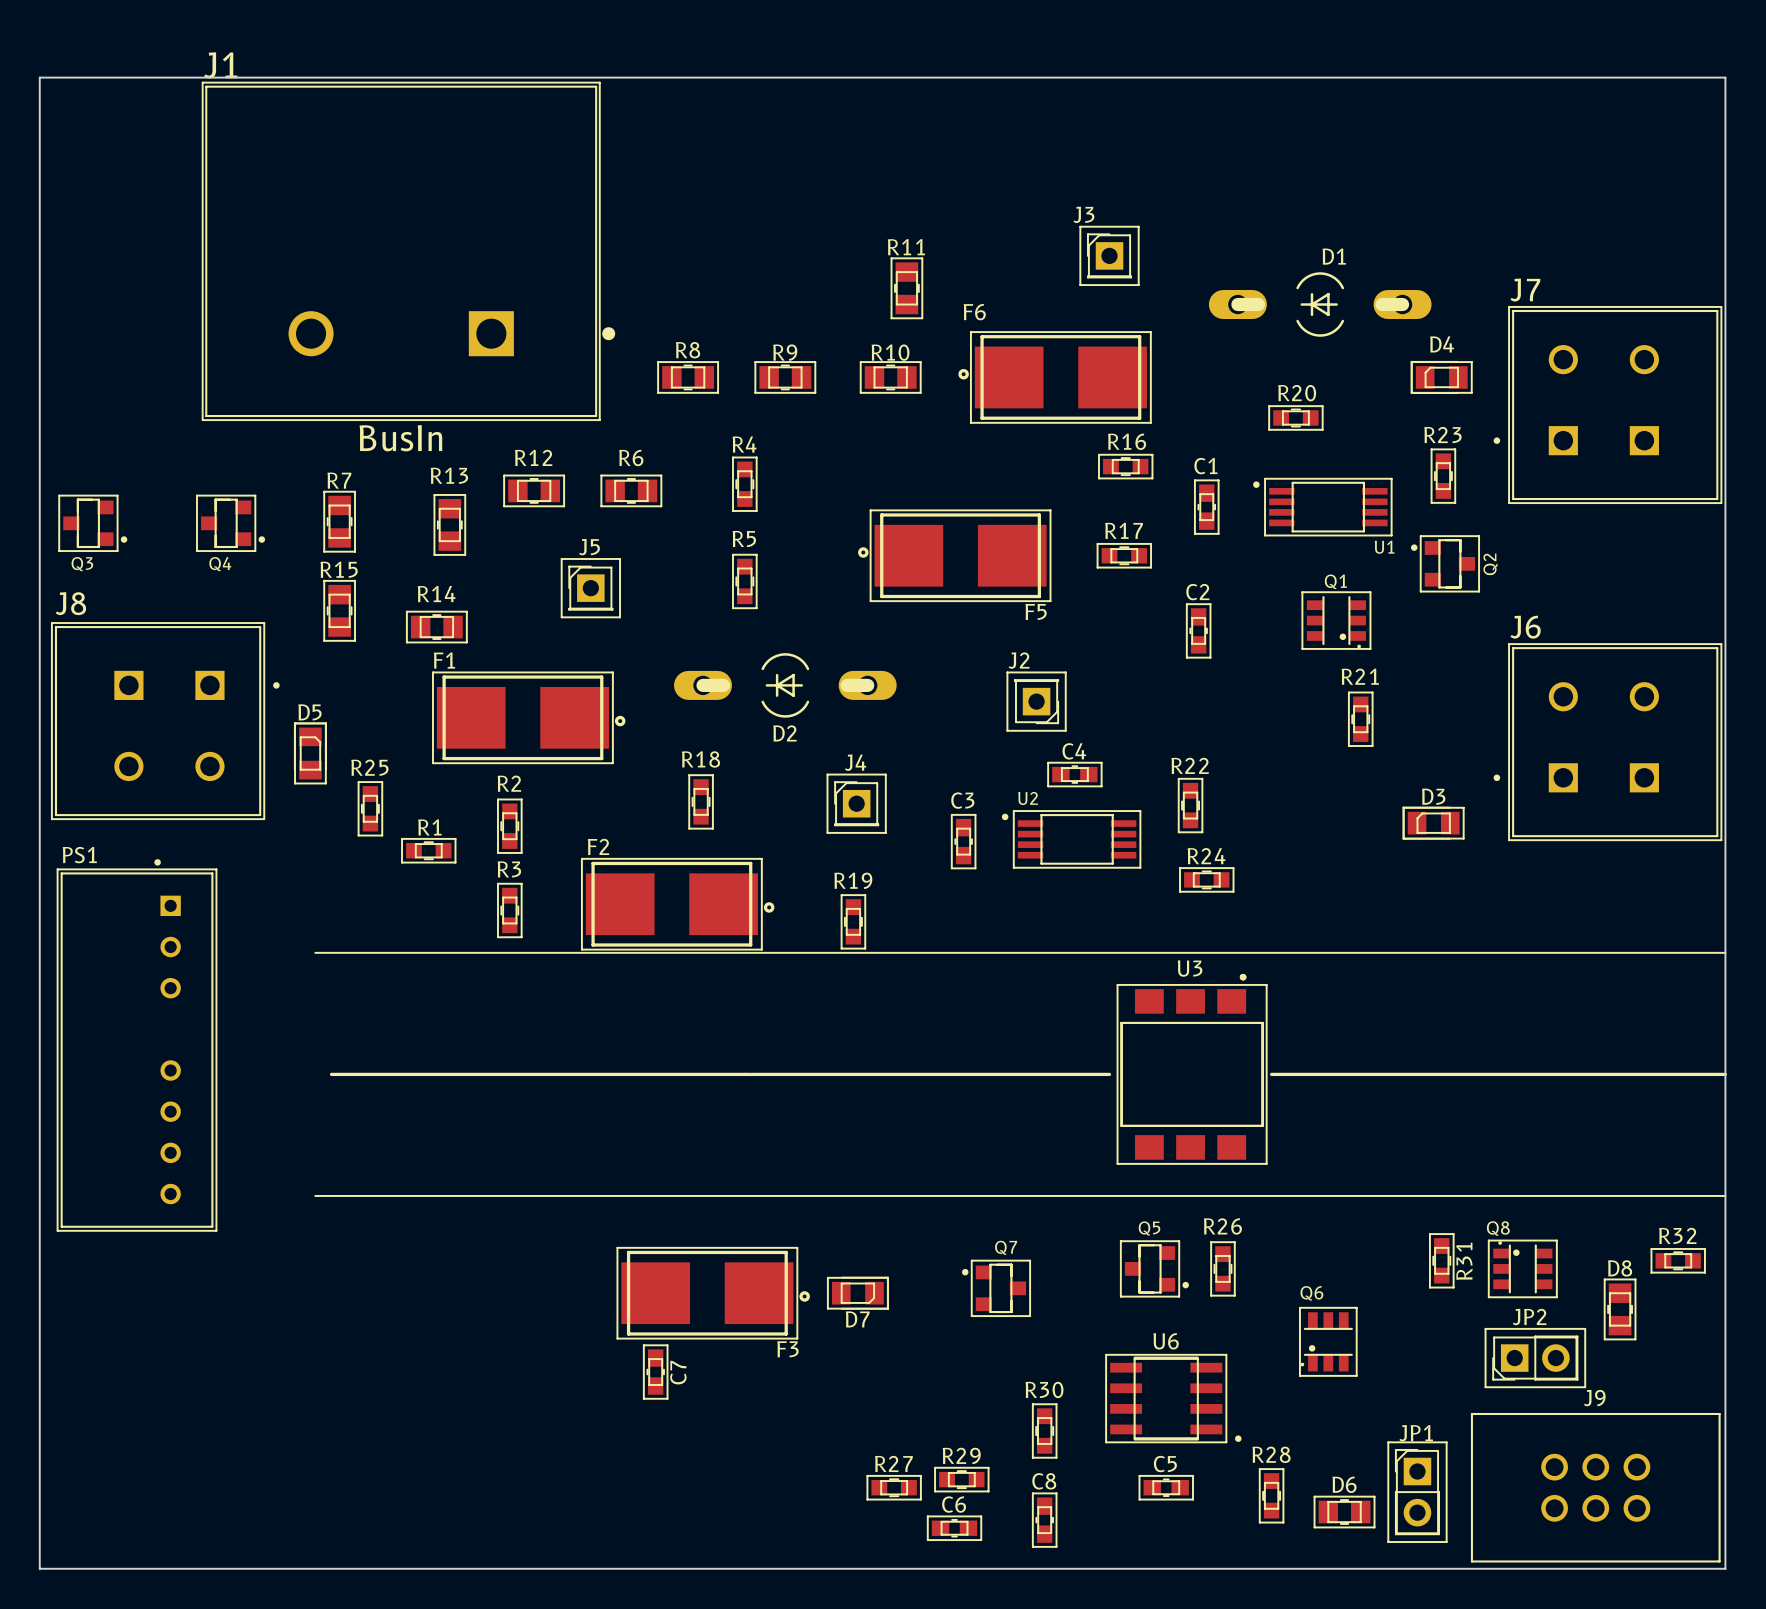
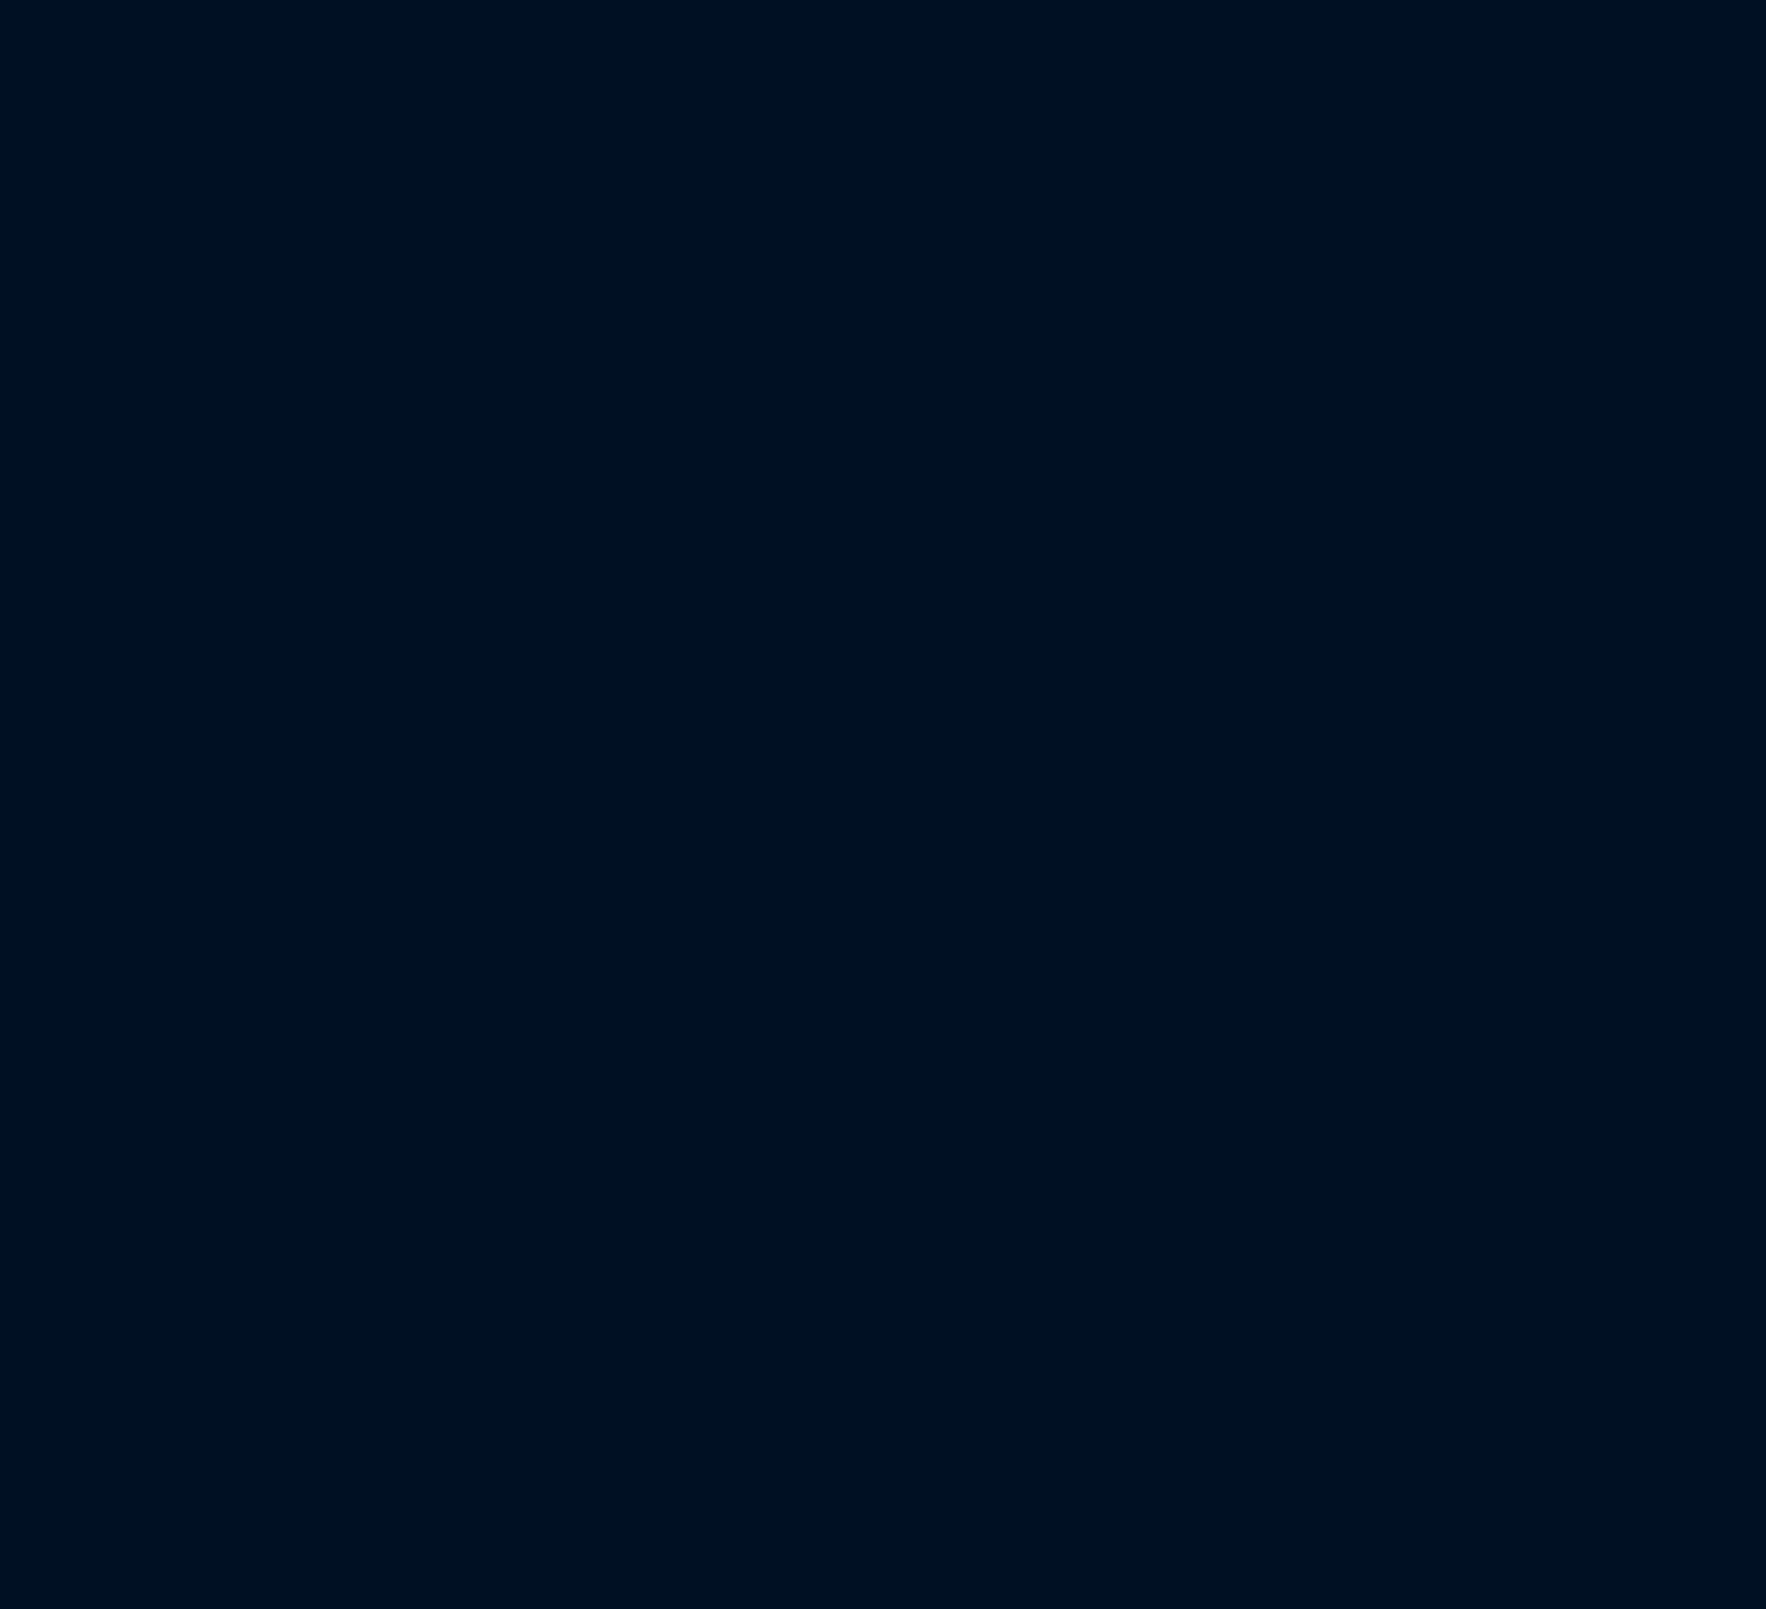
board edge: (39, 77) (39, 1568) (1725, 1568) (1725, 77) (39, 77) -> none
J1: BusIn (408, 251) -> none
J3: (1109, 255) -> none
R11: (906, 288) -> none
D1: (1320, 304) -> none
R8: (688, 377) -> none
R9: (785, 377) -> none
R10: (890, 377) -> none
F6: (1054, 377) -> none
D4: (1441, 377) -> none
J7: (1607, 405) -> none
R20: (1295, 417) -> none
R16: (1125, 466) -> none
R23: (1443, 476) -> none
R4: (744, 484) -> none
R12: (534, 490) -> none
R6: (631, 490) -> none
C1: (1206, 507) -> none
U1: (1322, 507) -> none
R7: (339, 521) -> none
Q3: (93, 523) -> none
Q4: (230, 523) -> none
R13: (449, 524) -> none
F5: (954, 555) -> none
R17: (1124, 555) -> none
Q2: (1445, 563) -> none
R5: (744, 581) -> none
J5: (590, 588) -> none
R15: (339, 610) -> none
Q1: (1336, 620) -> none
R14: (436, 627) -> none
C2: (1198, 630) -> none
D2: (785, 685) -> none
J2: (1036, 701) -> none
F1: (529, 717) -> none
R21: (1360, 719) -> none
J8: (165, 721) -> none
J6: (1607, 742) -> none
D5: (310, 753) -> none
C4: (1074, 774) -> none
R18: (701, 801) -> none
J4: (856, 803) -> none
R22: (1190, 805) -> none
R25: (370, 808) -> none
D3: (1433, 823) -> none
R2: (509, 826) -> none
U2: (1071, 839) -> none
C3: (963, 841) -> none
R1: (428, 850) -> none
R24: (1206, 879) -> none
F2: (677, 904) -> none
R3: (509, 910) -> none
R19: (853, 921) -> none
line: (315, 952) (1725, 952) -> none
PS1: (137, 1045) -> none
U3: (1192, 1069) -> none
line: (331, 1074) (1109, 1074) -> none
line: (1271, 1074) (1725, 1074) -> none
line: (315, 1195) (1725, 1195) -> none
R31: (1441, 1260) -> none
R32: (1678, 1260) -> none
Q5: (1154, 1268) -> none
R26: (1222, 1268) -> none
Q8: (1522, 1268) -> none
Q7: (996, 1288) -> none
F3: (713, 1293) -> none
D7: (858, 1293) -> none
D8: (1620, 1309) -> none
Q6: (1328, 1341) -> none
JP2: (1535, 1358) -> none
C7: (655, 1372) -> none
U6: (1173, 1398) -> none
R30: (1044, 1430) -> none
R29: (961, 1479) -> none
R27: (894, 1487) -> none
C5: (1166, 1487) -> none
J9: (1595, 1487) -> none
JP1: (1417, 1492) -> none
R28: (1271, 1495) -> none
D6: (1344, 1512) -> none
C8: (1044, 1520) -> none
C6: (954, 1528) -> none

